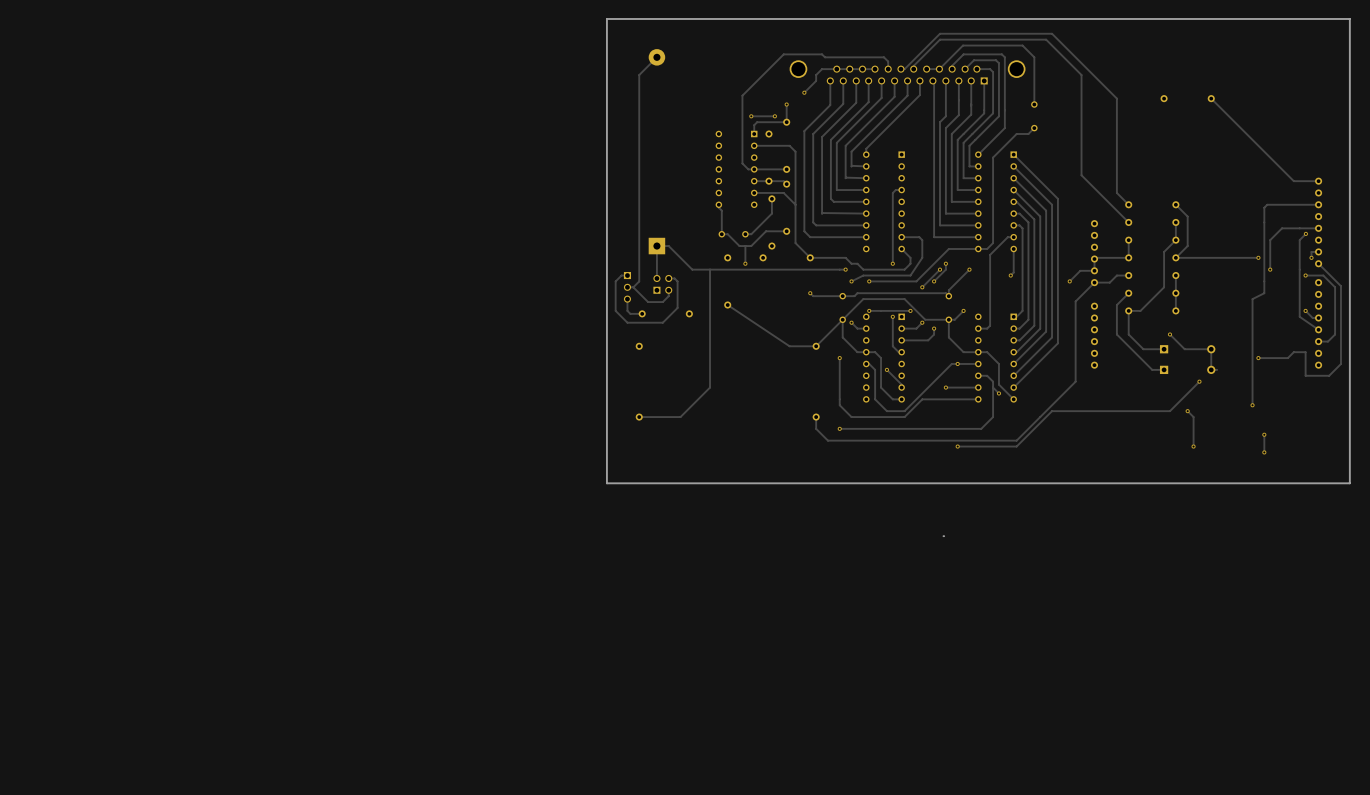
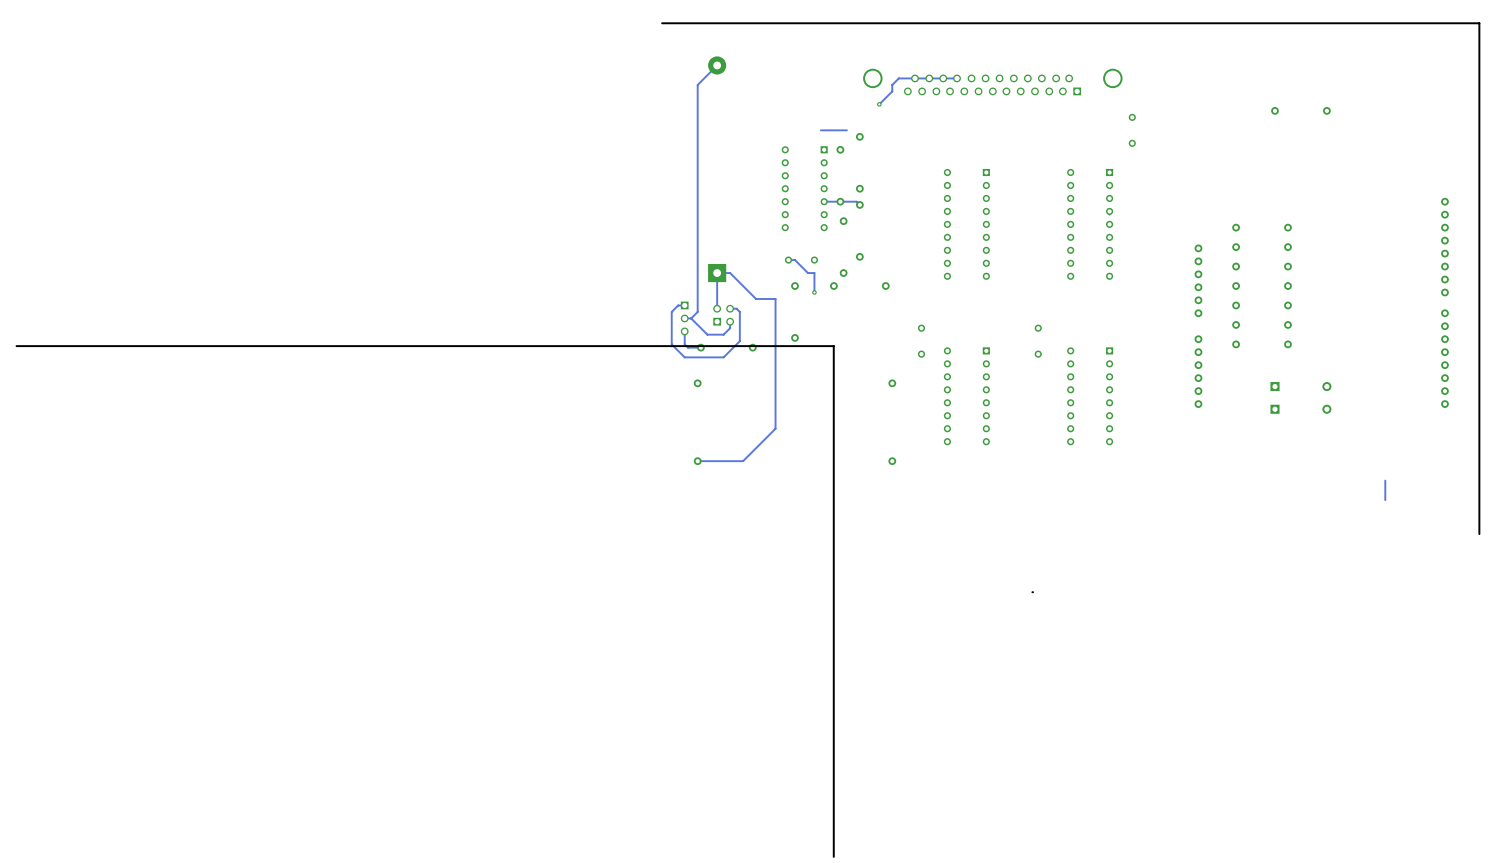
board edge: (606, 18) (606, 483) (1349, 483) -> none
track: (888, 69) (888, 61) (883, 57) (825, 57) (822, 54) (783, 54) (742, 95) (742, 163) (748, 169) (786, 169) -> none
track: (900, 69) (904, 69) (939, 33) (1052, 33) (1116, 98) (1116, 192) (1128, 204) -> none
track: (913, 69) (913, 65) (939, 39) (1046, 39) (1081, 75) (1081, 175) (1128, 222) -> none
track: (926, 69) (939, 69) (962, 45) (1022, 45) (1034, 57) (1034, 104) -> none
track: (952, 69) (952, 65) (963, 54) (1001, 54) (1004, 57) (1004, 128) (978, 154) -> none
track: (965, 69) (973, 60) (996, 60) (998, 63) (998, 116) (969, 145) (969, 166) (978, 166) -> none
track: (976, 69) (990, 69) (993, 72) (993, 113) (963, 142) (963, 178) (978, 178) -> none
track: (830, 80) (830, 105) (804, 131) (804, 231) (810, 237) (866, 237) -> none
track: (843, 80) (843, 103) (813, 134) (813, 222) (816, 225) (866, 225) -> none
track: (856, 80) (856, 102) (822, 136) (822, 213) (866, 213) -> none
track: (868, 80) (868, 102) (830, 139) (830, 198) (833, 201) (866, 201) -> none
track: (881, 80) (881, 98) (836, 142) (836, 190) (866, 190) -> none
track: (894, 80) (894, 96) (845, 145) (845, 178) (866, 178) -> none
track: (907, 80) (907, 95) (851, 151) (851, 166) (866, 166) -> none
track: (919, 80) (919, 95) (866, 148) (866, 154) -> none
track: (932, 80) (934, 237) (978, 237) -> none
track: (945, 80) (945, 116) (939, 122) (939, 225) (978, 225) -> none
track: (958, 80) (958, 115) (945, 128) (945, 213) (978, 213) -> none
track: (971, 80) (971, 114) (951, 134) (951, 201) (978, 201) -> none
track: (984, 80) (984, 113) (957, 139) (957, 190) (978, 190) -> none
track: (1211, 98) (1293, 181) (1318, 181) -> none
track: (786, 104) (786, 122) (757, 122) (754, 125) (754, 134) -> none
via: (786, 104) -> none
via: (751, 116) -> none
via: (774, 116) -> none
track: (1034, 128) (1028, 134) (1016, 134) (993, 157) (993, 243) (987, 248) (948, 248) (916, 281) (869, 281) -> none
track: (754, 145) (789, 145) (795, 151) (795, 243) (810, 257) (845, 257) (851, 263) (857, 263) (863, 269) (904, 269) (910, 263) (910, 257) (901, 248) -> none
track: (1013, 154) (1057, 198) (1057, 343) (1013, 387) -> none
track: (1013, 166) (1052, 204) (1052, 337) (1013, 375) (1013, 372) -> none
track: (1013, 178) (1046, 210) (1046, 331) (1013, 363) -> none
track: (901, 190) (895, 190) (892, 192) (892, 263) -> none
track: (1013, 190) (1040, 216) (1040, 328) (1016, 352) (1013, 352) -> none
track: (754, 192) (783, 192) (795, 204) -> none
track: (771, 198) (771, 213) (751, 234) (745, 234) -> none
track: (1013, 201) (1016, 201) (1034, 219) (1034, 325) (1019, 340) (1013, 340) -> none
track: (718, 204) (721, 210) (721, 234) -> none
track: (1175, 204) (1187, 216) (1187, 246) (1175, 257) (1258, 257) -> none
track: (1318, 204) (1267, 204) (1264, 207) (1264, 293) (1252, 299) (1252, 405) -> none
track: (1013, 213) (1019, 213) (1028, 222) (1028, 319) (1019, 328) (1013, 328) -> none
track: (1175, 222) (1175, 240) (1164, 251) (1164, 287) (1140, 310) (1128, 310) (1128, 334) (1143, 349) (1164, 349) -> none
track: (1013, 225) (1019, 225) (1022, 228) (1022, 310) (1016, 316) (1013, 316) -> none
track: (1318, 228) (1282, 228) (1270, 240) (1270, 269) -> none
track: (786, 231) (766, 231) (751, 246) (745, 246) -> none
track: (1305, 233) (1299, 240) (1299, 316) (1318, 329) -> none
via: (1305, 233) -> none
track: (901, 237) (919, 237) (922, 240) (922, 257) (910, 275) (863, 275) (851, 281) -> none
track: (1013, 237) (1007, 237) (990, 254) (990, 325) (987, 328) (978, 328) -> none
track: (1128, 240) (1128, 257) (1095, 257) (1094, 270) (1080, 270) (1069, 281) -> none
track: (1013, 248) (1013, 272) (1010, 275) -> none
track: (1318, 251) (1311, 251) (1311, 257) -> none
via: (1258, 257) -> none
via: (1311, 257) -> none
via: (892, 263) -> none
track: (945, 263) (945, 269) (934, 281) -> none
via: (945, 263) -> none
track: (1318, 263) (1340, 286) (1340, 363) (1329, 375) (1305, 375) (1305, 352) (1293, 352) (1287, 358) (1258, 358) -> none
track: (845, 269) (710, 269) -> none
via: (845, 269) -> none
track: (939, 269) (922, 287) -> none
via: (939, 269) -> none
track: (969, 269) (948, 290) (948, 296) (945, 293) (857, 293) (854, 296) (813, 296) (810, 293) -> none
via: (969, 269) -> none
via: (1270, 269) -> none
via: (1010, 275) -> none
track: (1128, 275) (1116, 275) (1109, 282) (1094, 282) (1075, 301) (1075, 381) (1016, 440) (827, 440) (816, 428) (816, 417) -> none
track: (1175, 275) (1175, 310) -> none
track: (1305, 275) (1323, 275) (1335, 287) (1335, 334) (1328, 341) (1318, 341) -> none
via: (1305, 275) -> none
via: (851, 281) -> none
via: (869, 281) -> none
via: (934, 281) -> none
via: (1069, 281) -> none
via: (922, 287) -> none
via: (810, 293) -> none
track: (1128, 293) (1116, 305) (1116, 334) (1152, 369) (1164, 369) -> none
track: (727, 305) (789, 346) (816, 346) (863, 299) (904, 299) (925, 319) (954, 319) (963, 310) -> none
via: (869, 310) -> none
track: (910, 310) (869, 310) -> none
via: (910, 310) -> none
via: (963, 310) -> none
track: (1305, 310) (1312, 317) (1318, 317) -> none
via: (1305, 310) -> none
board edge: none -> (16, 346) (833, 346) (833, 856)
track: (892, 316) (892, 346) (898, 352) (901, 352) -> none
via: (892, 316) -> none
track: (842, 319) (842, 337) (857, 352) (875, 352) (881, 358) (881, 387) (892, 399) (901, 399) -> none
track: (948, 319) (948, 337) (963, 352) (987, 352) (998, 363) (998, 384) (1013, 399) -> none
track: (851, 322) (857, 328) (866, 328) -> none
via: (851, 322) -> none
track: (922, 322) (916, 328) (901, 328) -> none
via: (922, 322) -> none
track: (934, 328) (934, 334) (928, 340) (901, 340) -> none
via: (934, 328) -> none
track: (1169, 334) (1184, 349) (1211, 349) (1211, 369) (1217, 369) -> none
via: (1169, 334) -> none
track: (839, 358) (839, 405) (851, 417) (904, 417) (922, 399) (978, 399) -> none
via: (839, 358) -> none
via: (1258, 358) -> none
via: (957, 363) -> none
track: (978, 363) (951, 363) (904, 411) (886, 411) (875, 399) (875, 369) (869, 363) (866, 363) -> none
track: (886, 369) (901, 384) (901, 387) -> none
via: (886, 369) -> none
track: (978, 375) (987, 375) (993, 381) (993, 417) (981, 428) (839, 428) -> none
track: (1199, 381) (1169, 411) (1052, 411) (1016, 446) (957, 446) -> none
via: (1199, 381) -> none
via: (945, 387) -> none
track: (978, 387) (945, 387) -> none
track: (993, 387) (998, 393) -> none
via: (998, 393) -> none
via: (1252, 405) -> none
track: (1187, 411) (1193, 417) (1193, 446) -> none
via: (1187, 411) -> none
via: (839, 428) -> none
via: (1264, 434) -> none
via: (957, 446) -> none
via: (1193, 446) -> none
via: (1264, 452) -> none

